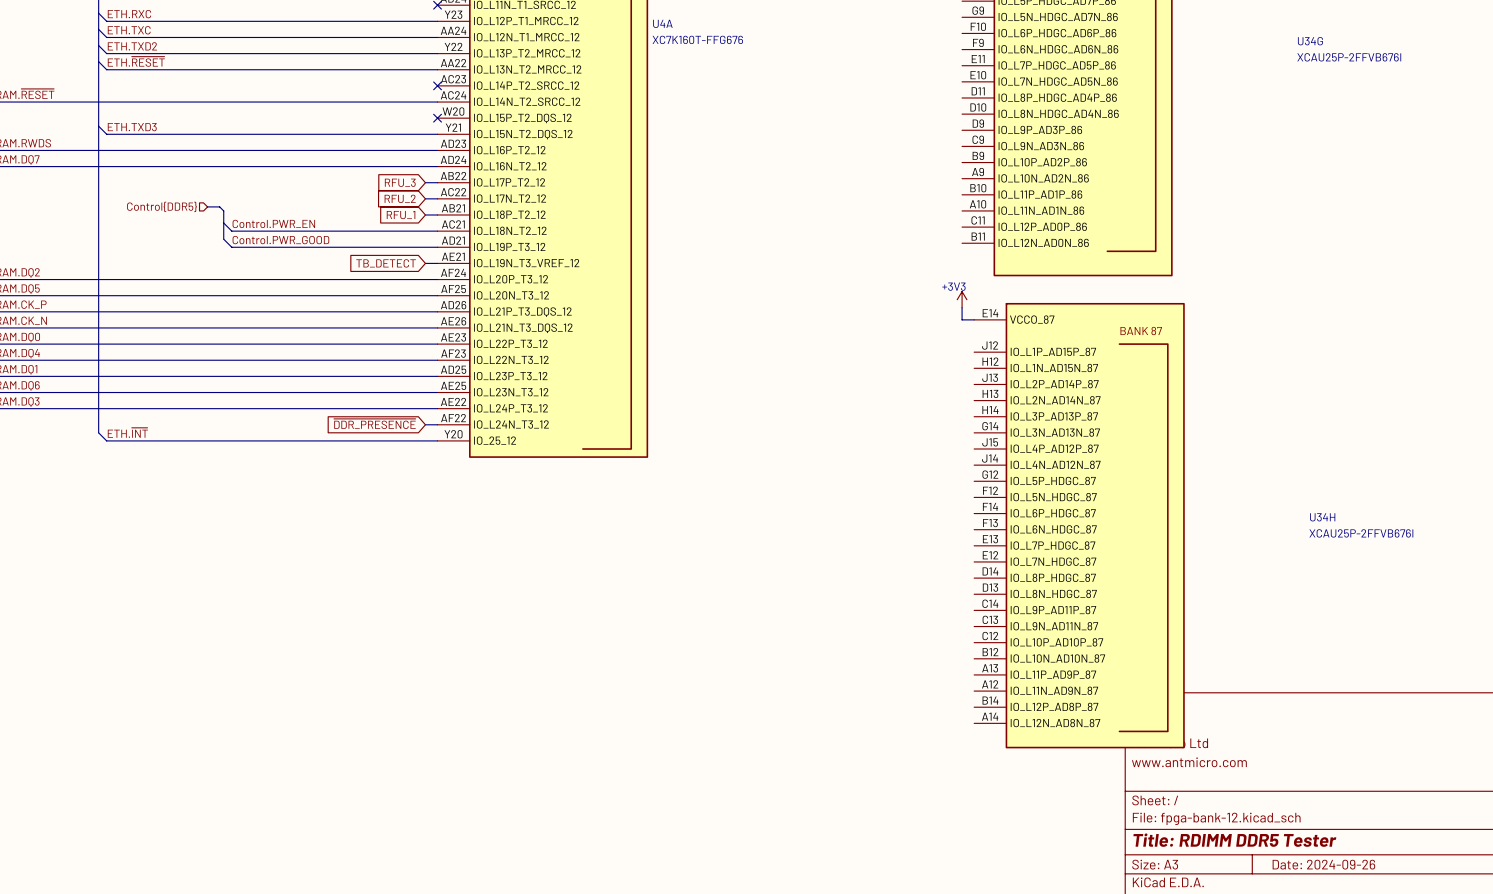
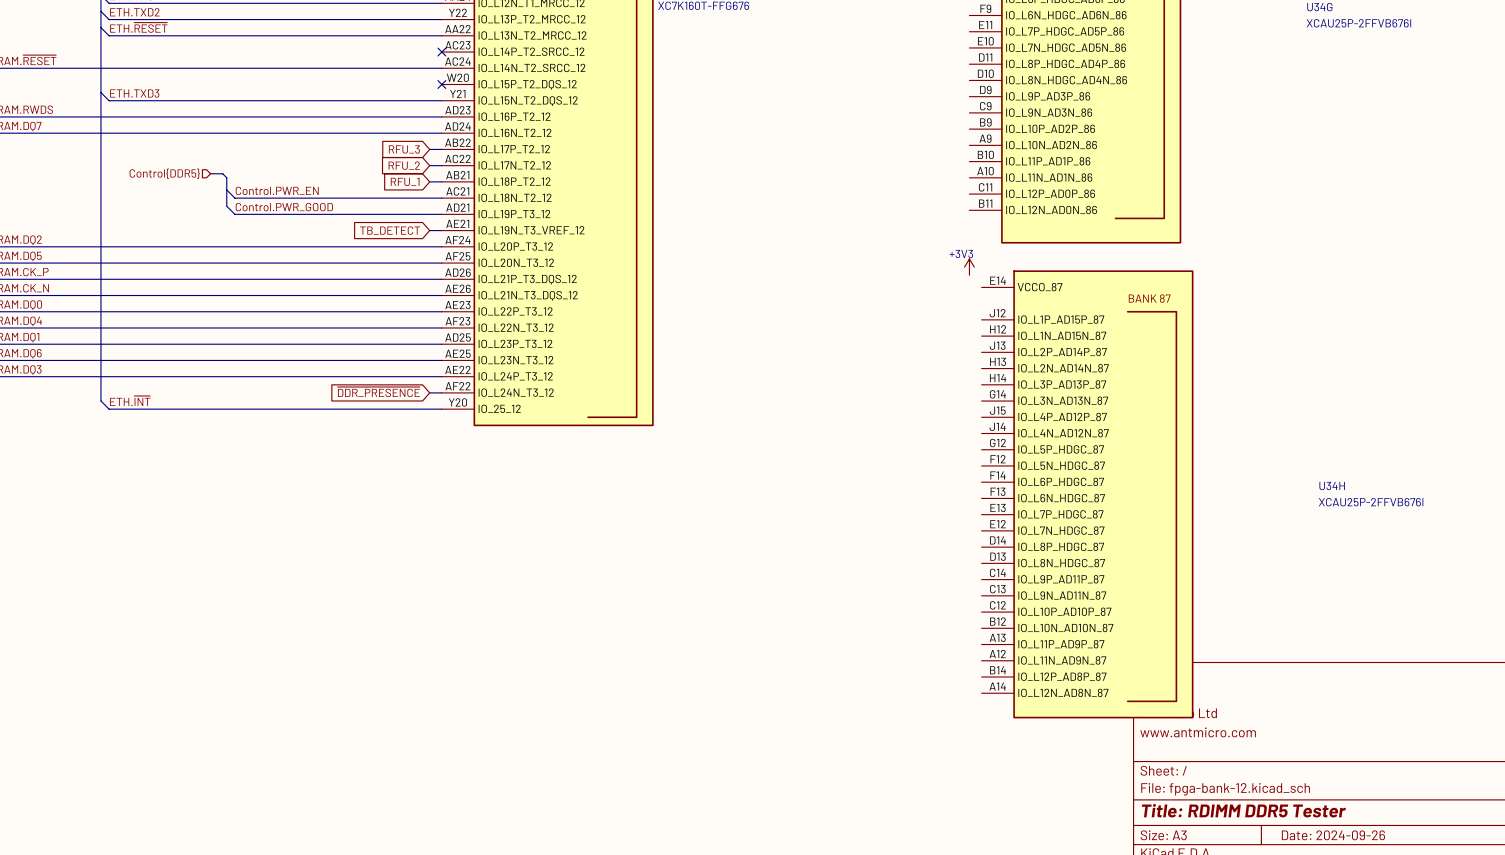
wire: (962, 307) (962, 319) (974, 319) -> none

